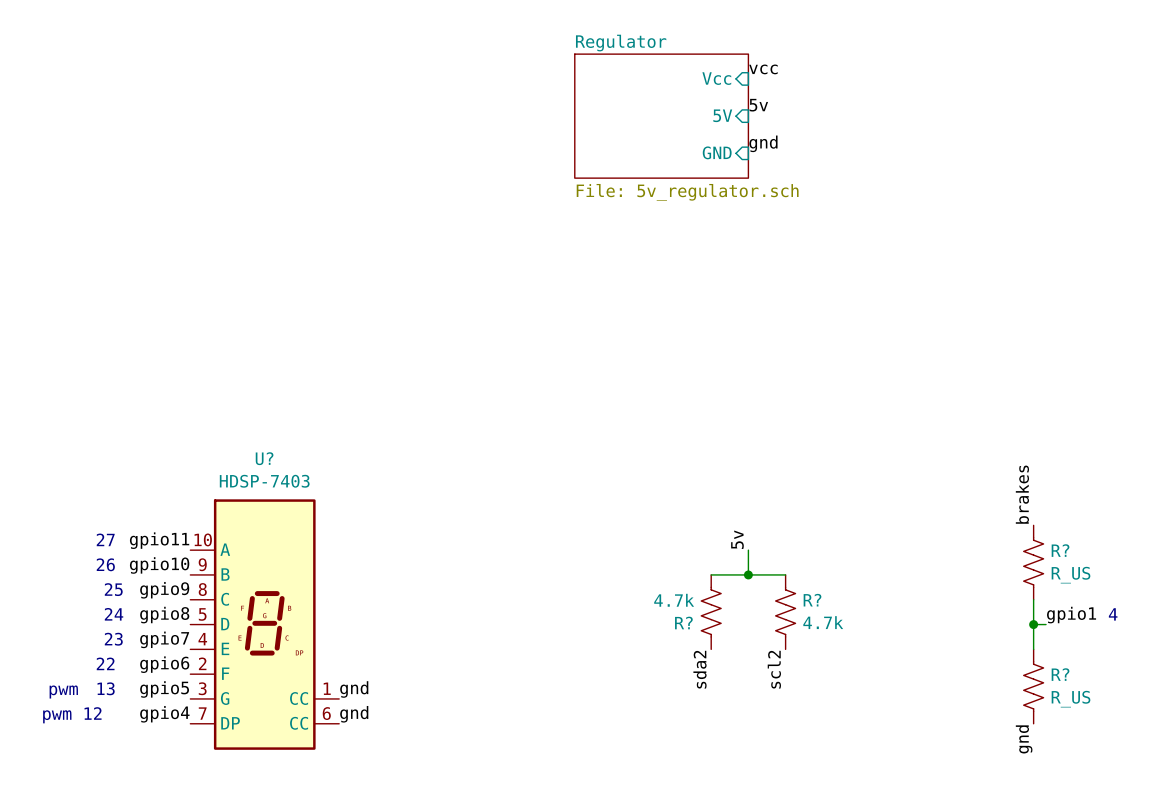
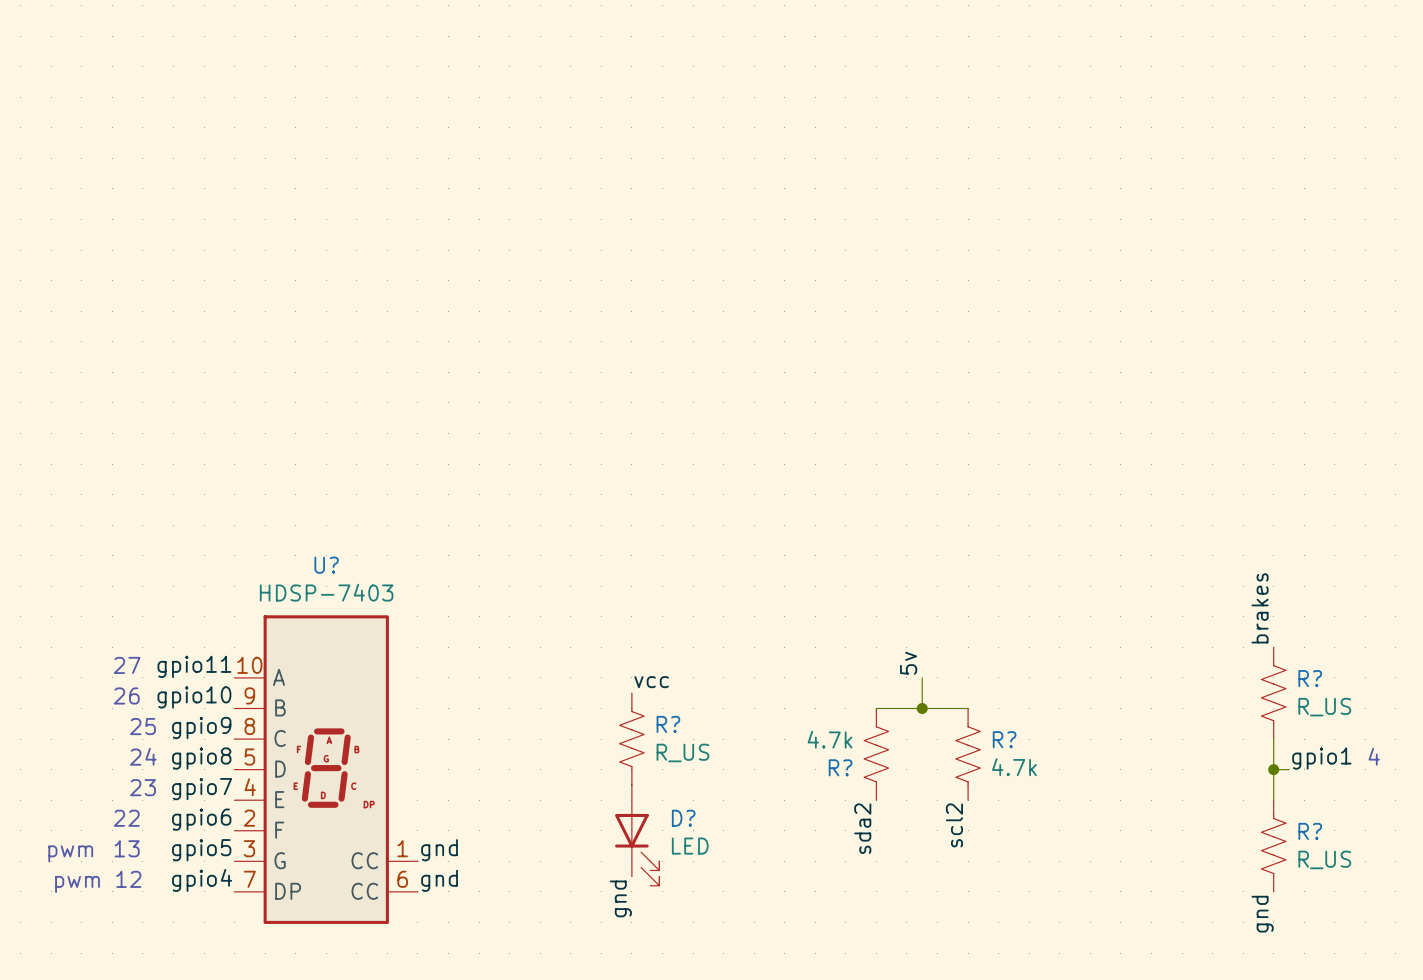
label: vcc (763, 69) -> none
sheet pin: Vcc (716, 78) -> none
label: 5v (758, 105) -> none
sheet pin: 5V (722, 115) -> none
sheet Regulator: File: 5v_regulator.sch (661, 116) -> none
label: gnd (763, 143) -> none
sheet pin: GND (717, 152) -> none
label: none -> vcc (651, 682)
R?: none -> R_US (631, 739)
D?: none -> LED (637, 835)
label: none -> gnd (620, 898)

